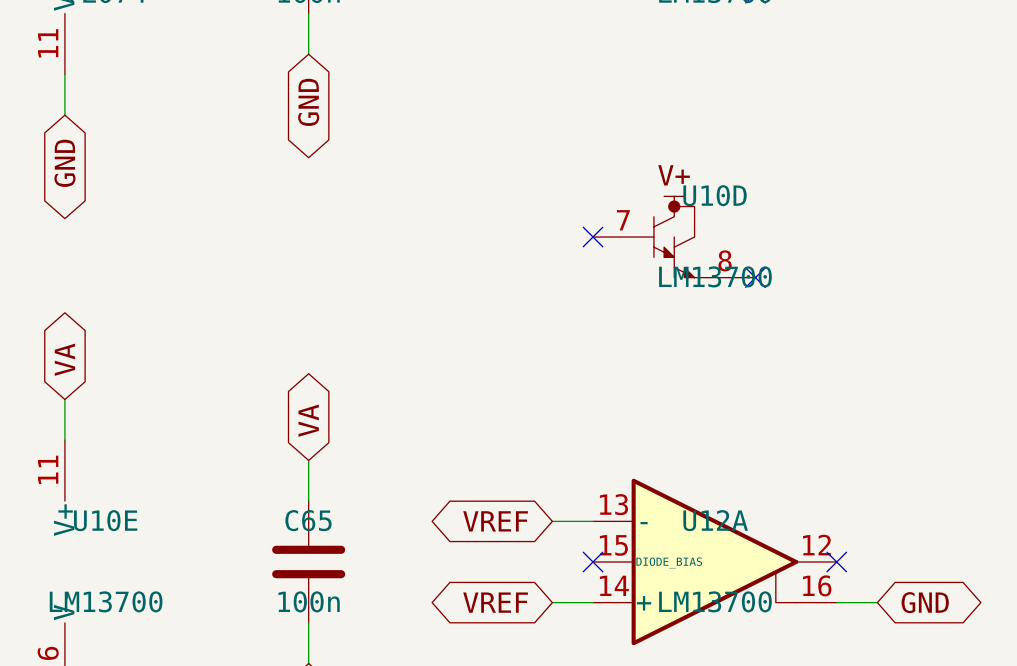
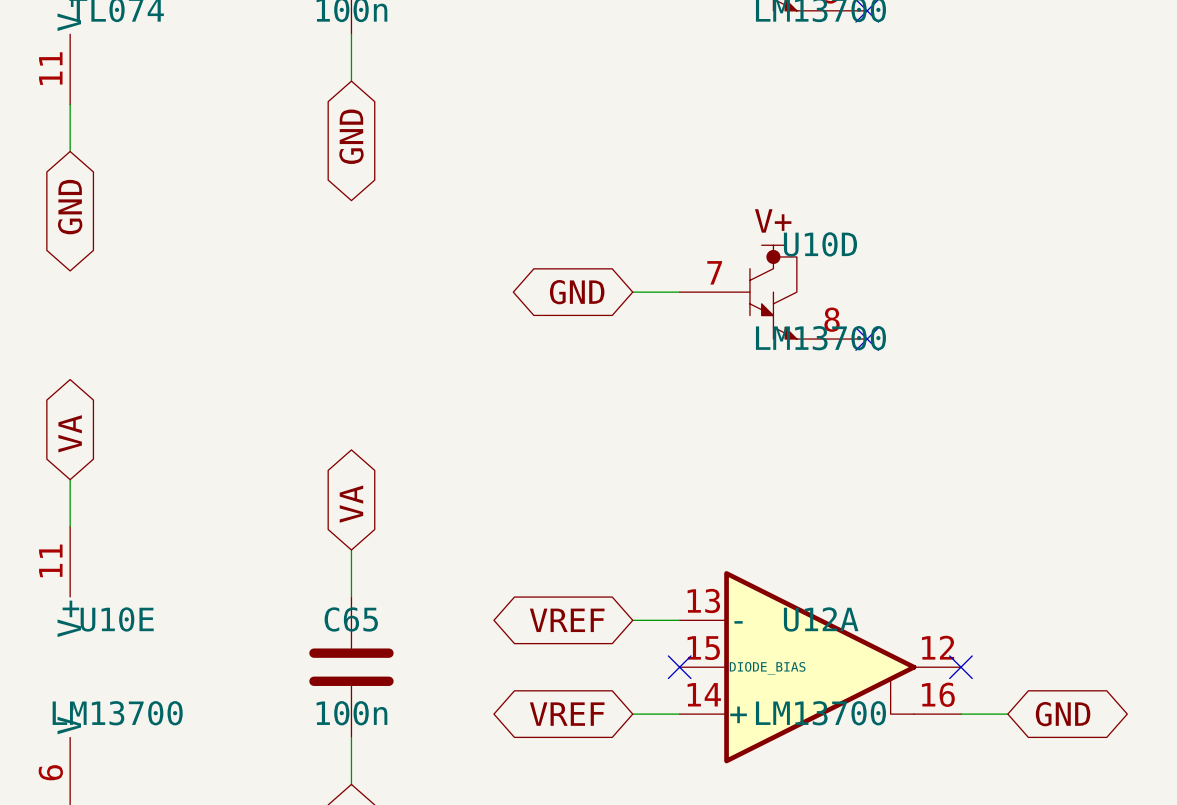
global label: none -> GND (577, 292)
wire: none -> (632, 292) (679, 292)
no-connect mark: (593, 237) -> none

